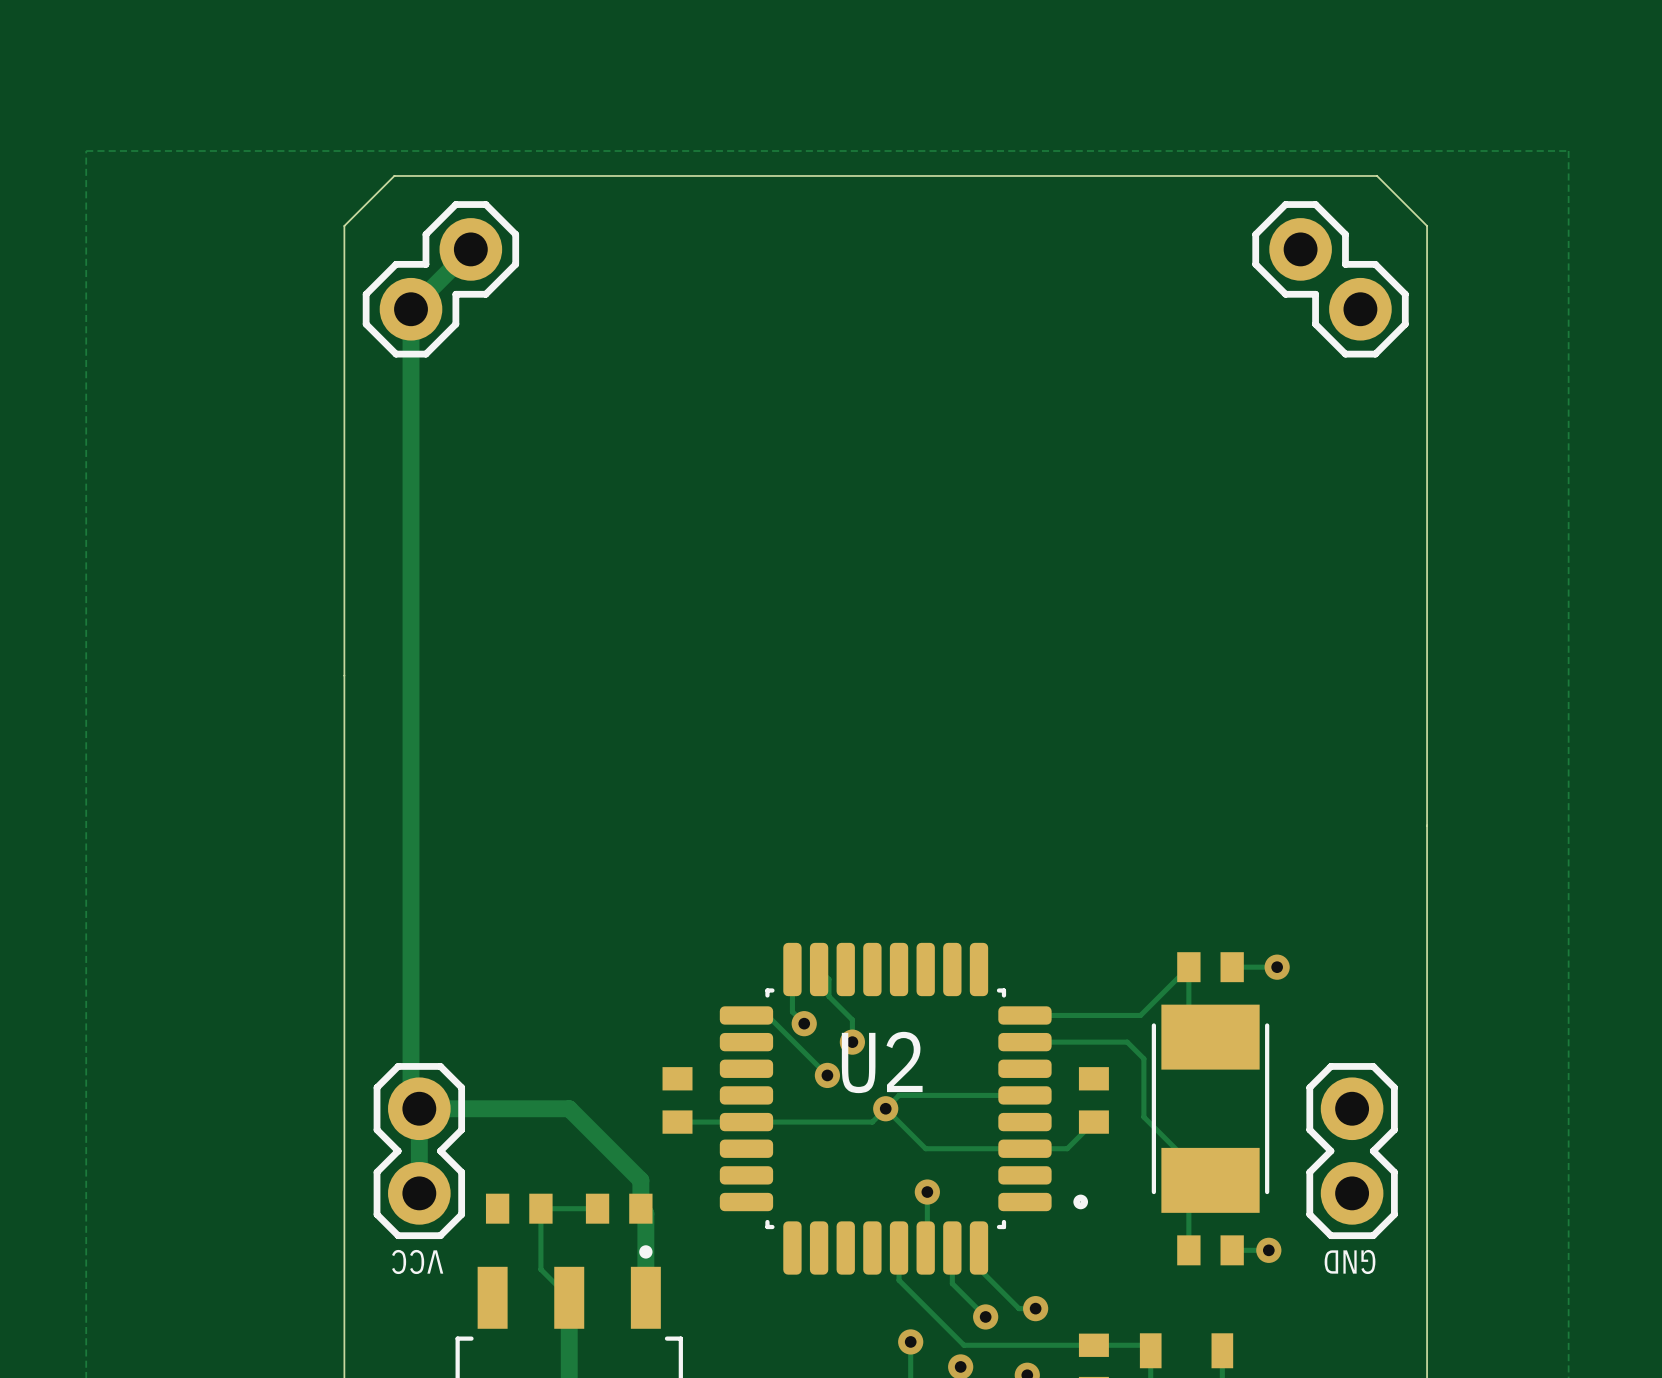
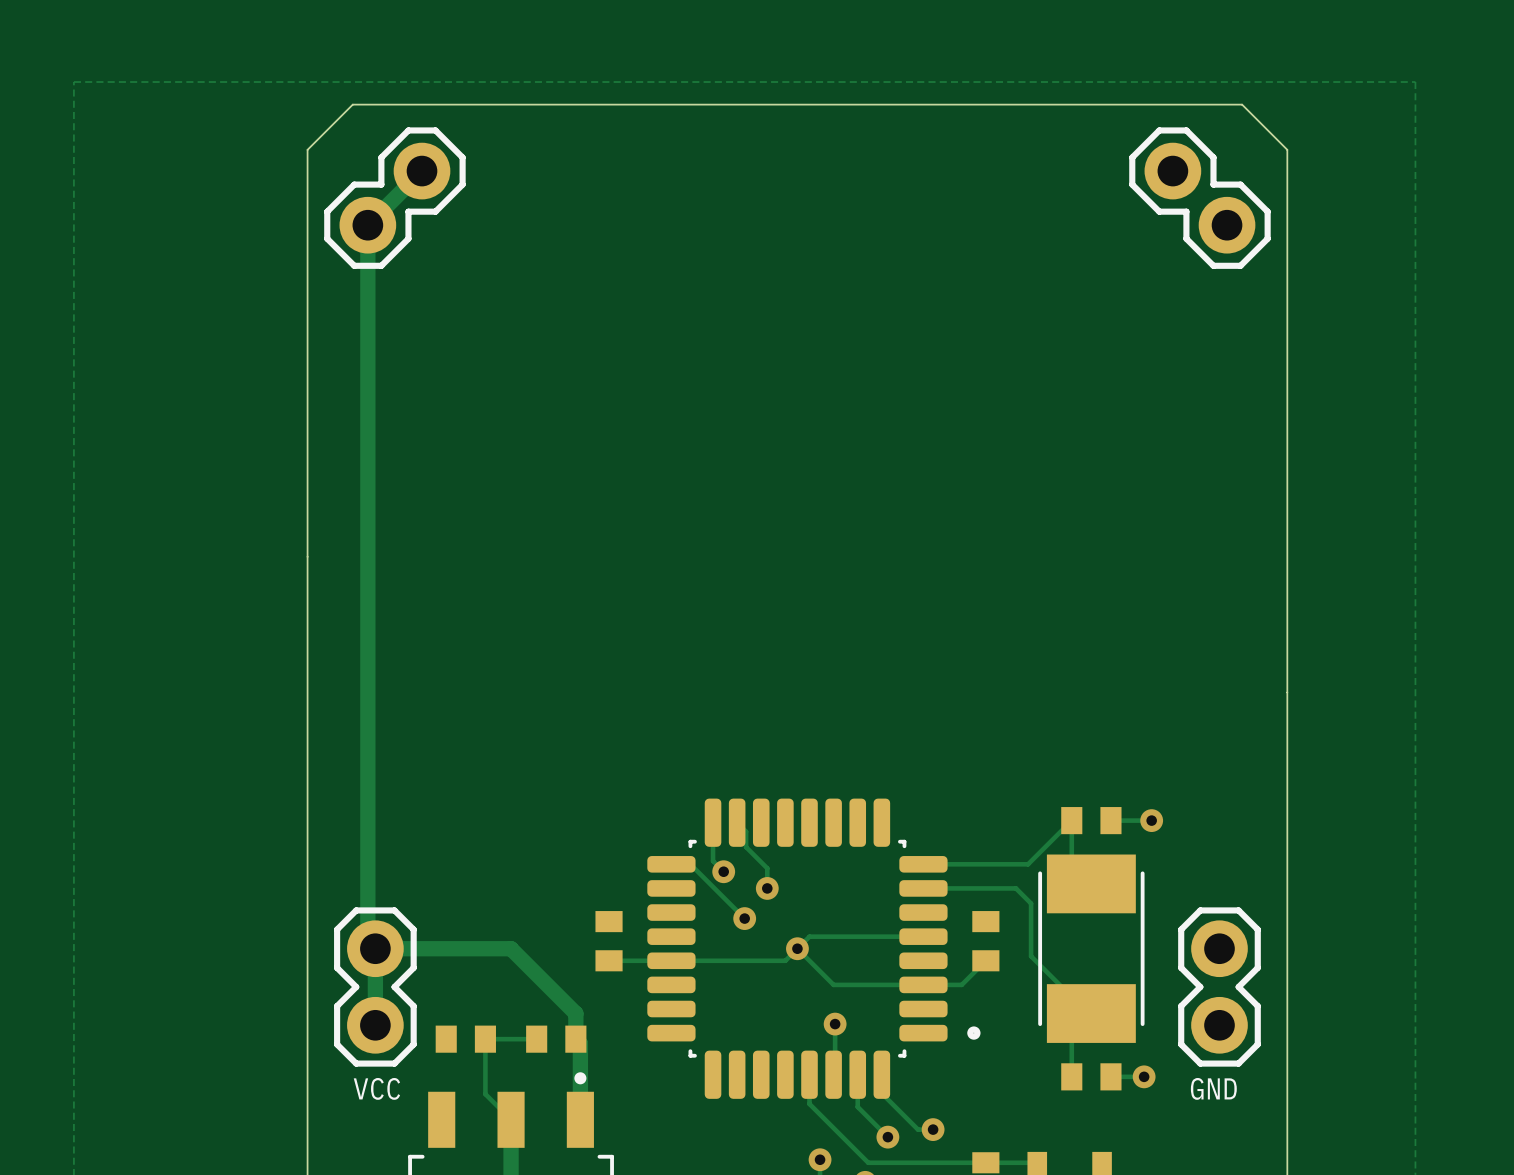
text: U2 (882, 1062) -> none
text rotation: 0° (417, 1261) -> 180° (376, 1088)
text rotation: 0° (1350, 1261) -> 180° (1213, 1088)

